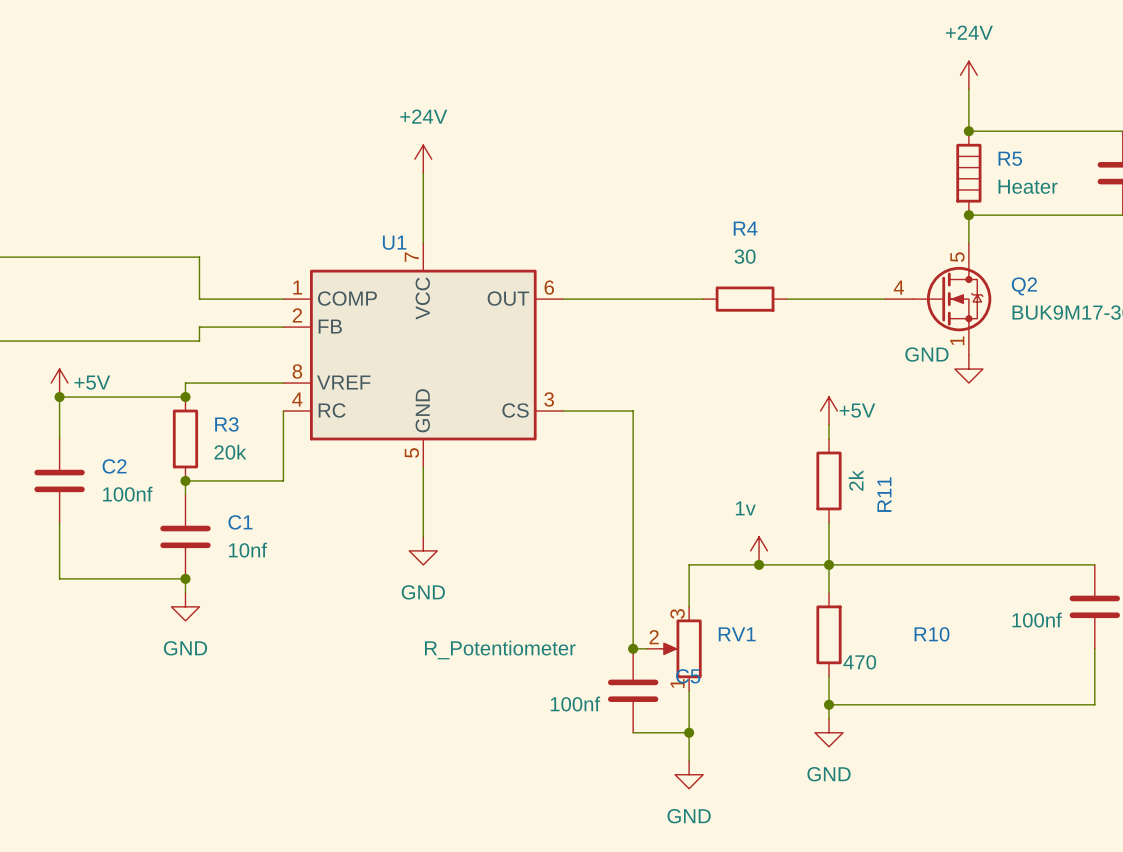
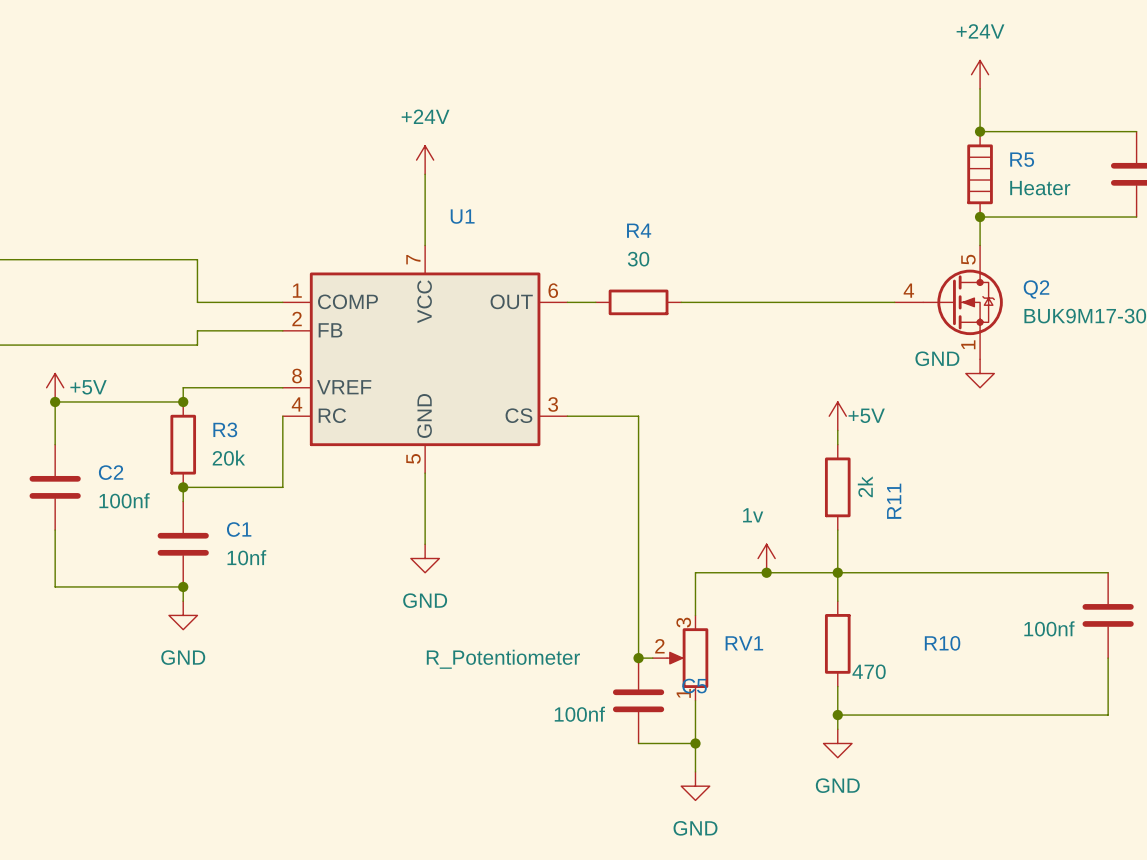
U1 name position: U1 (394, 242) -> U1 (462, 216)
wire: (591, 299) (675, 299) -> (709, 302) (795, 302)
R4 position: (745, 299) -> (638, 302)

